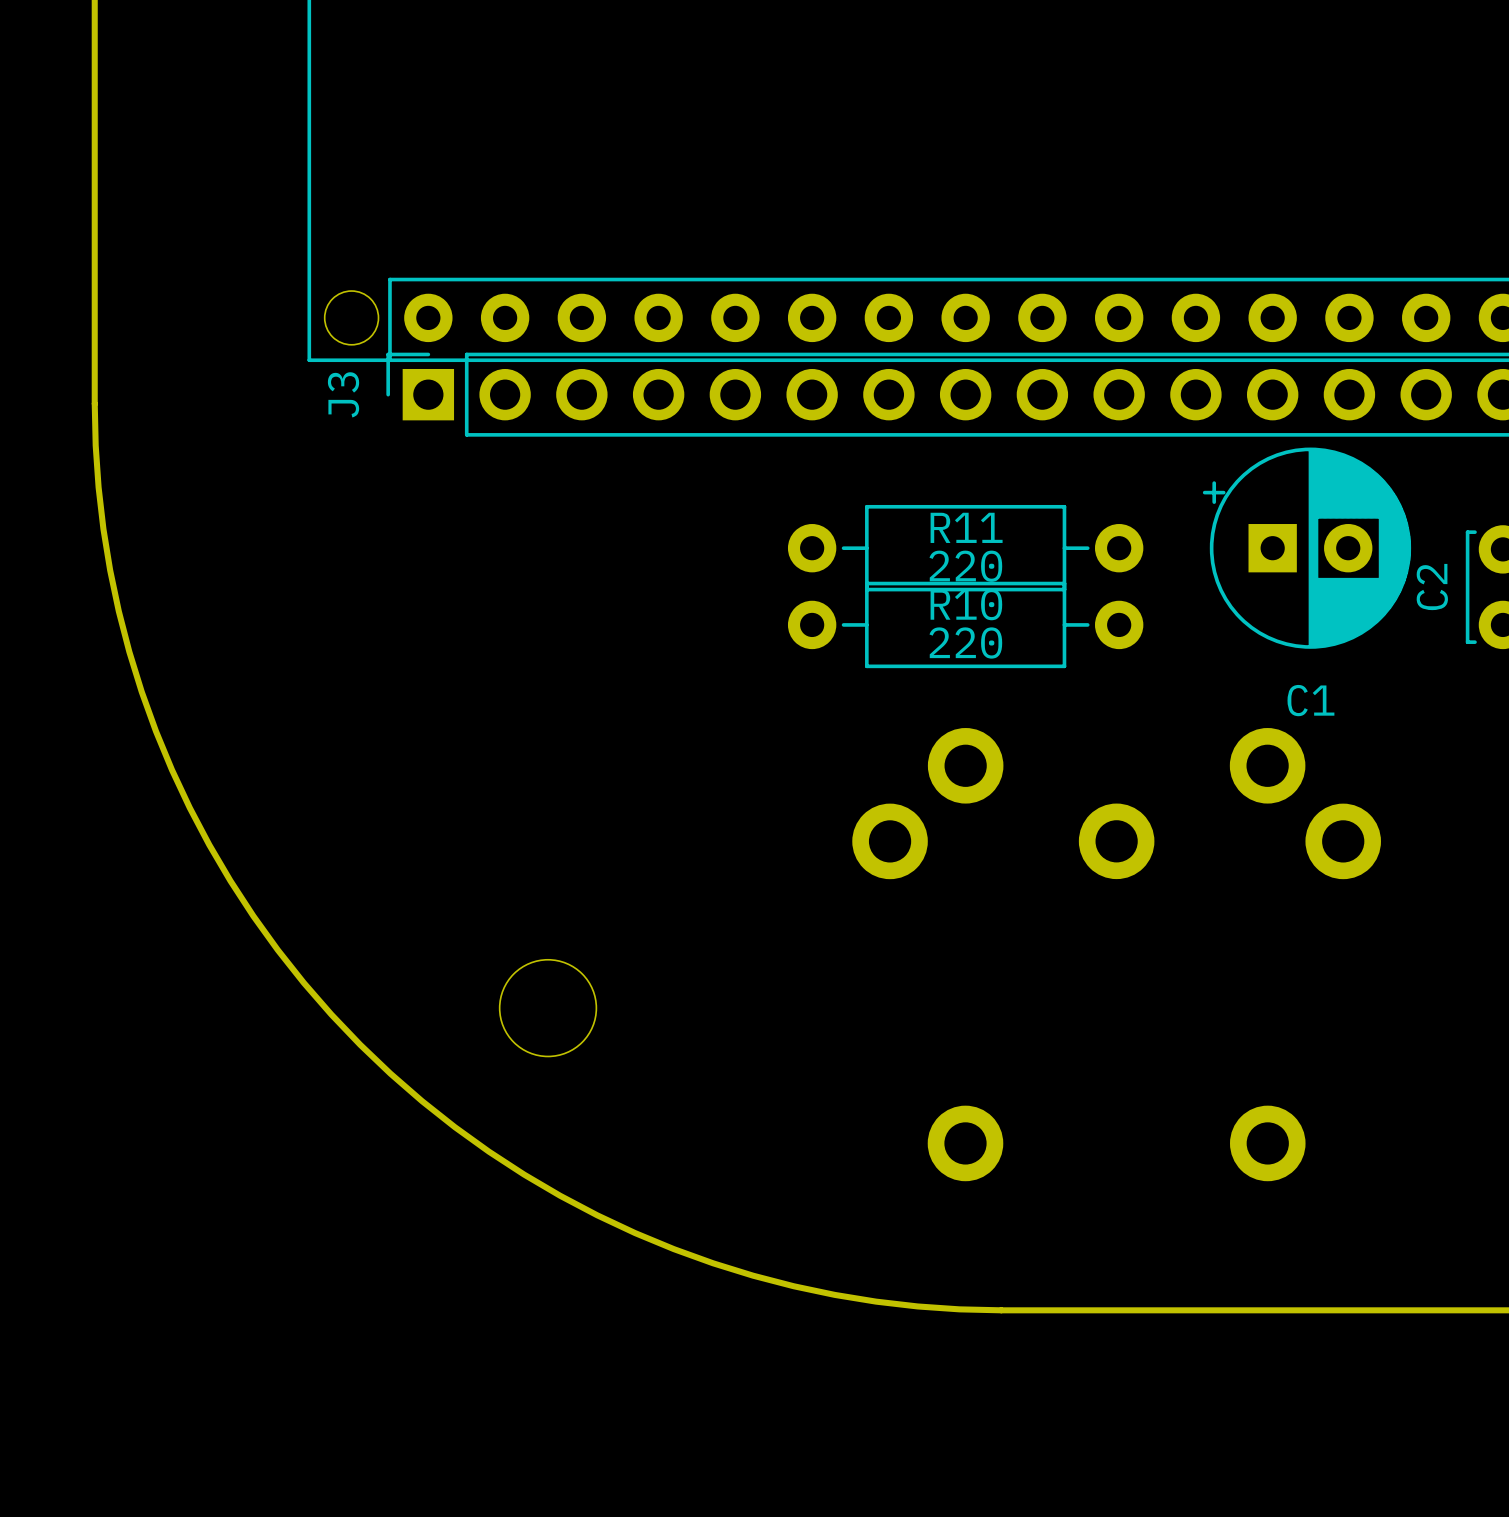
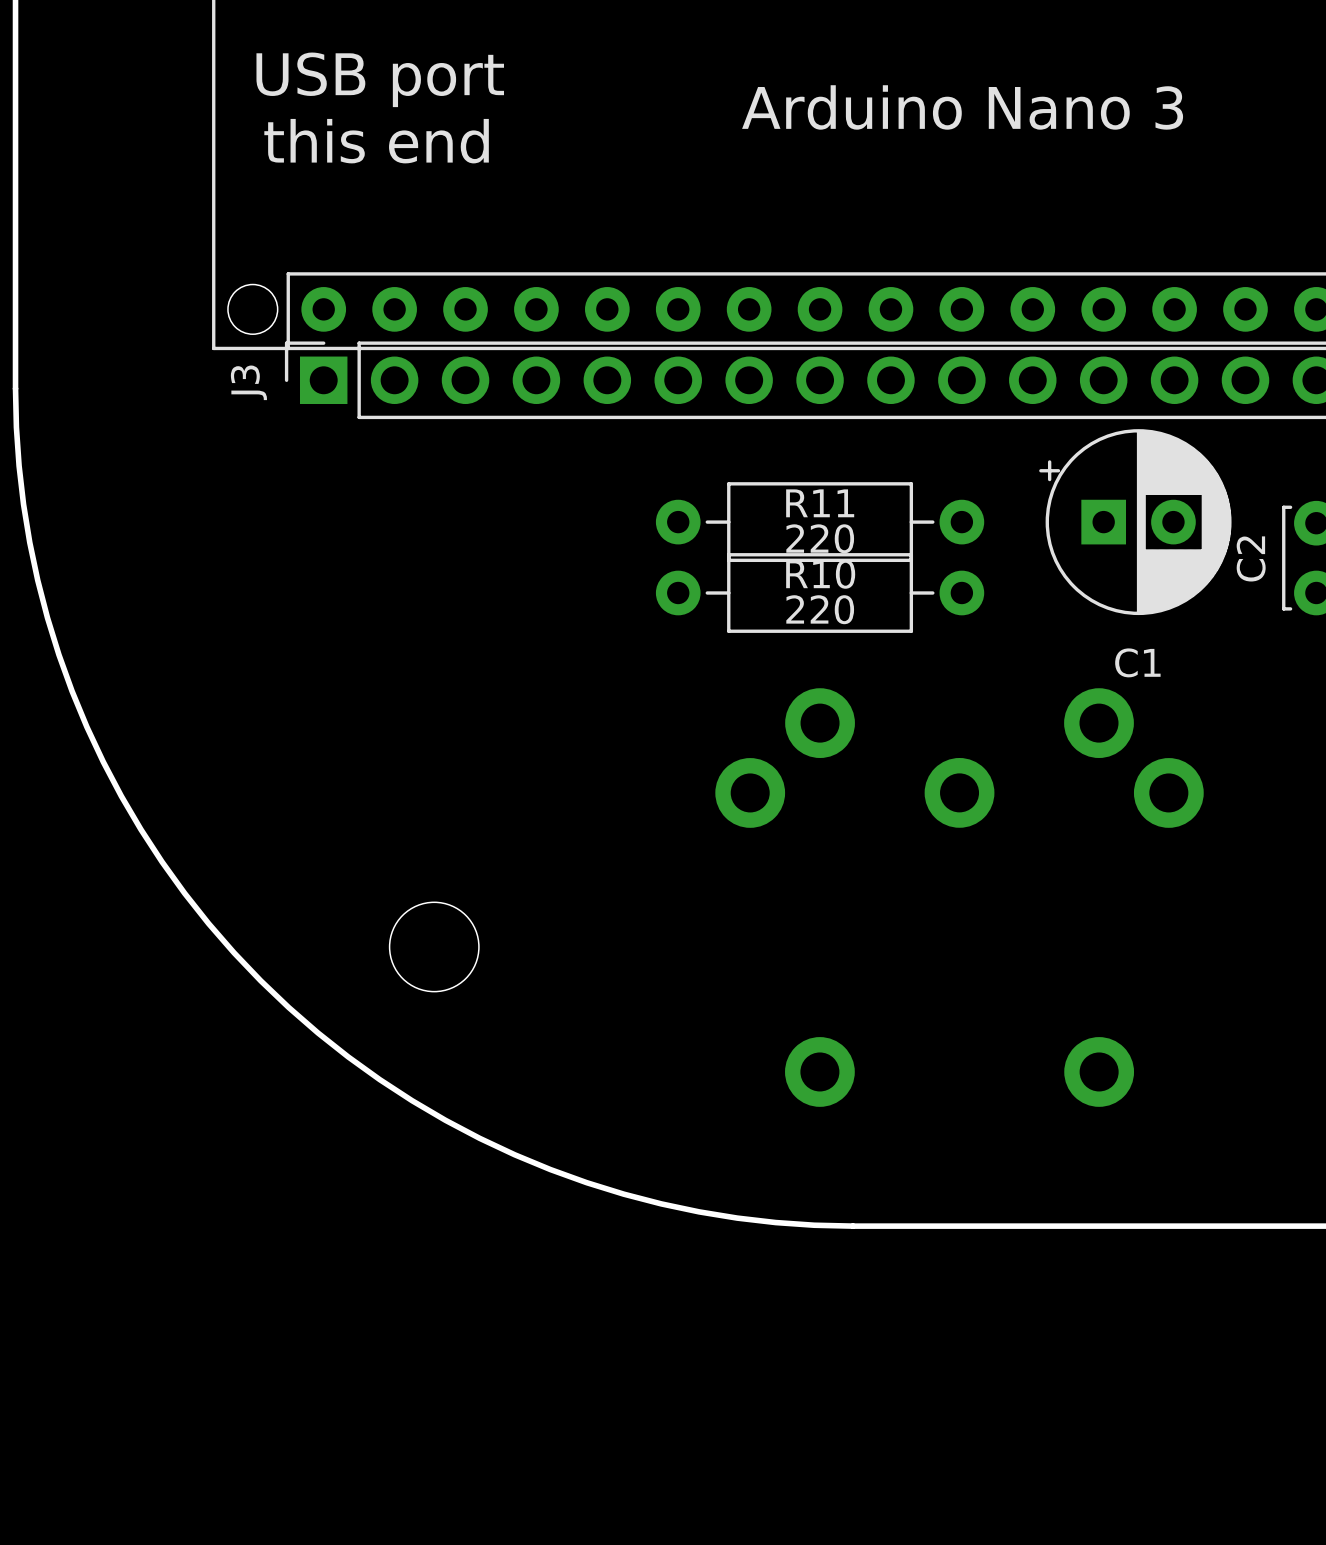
text: none -> USB port (380, 79)
text: none -> Arduino Nano 3 (962, 107)
text: none -> this end (376, 141)

